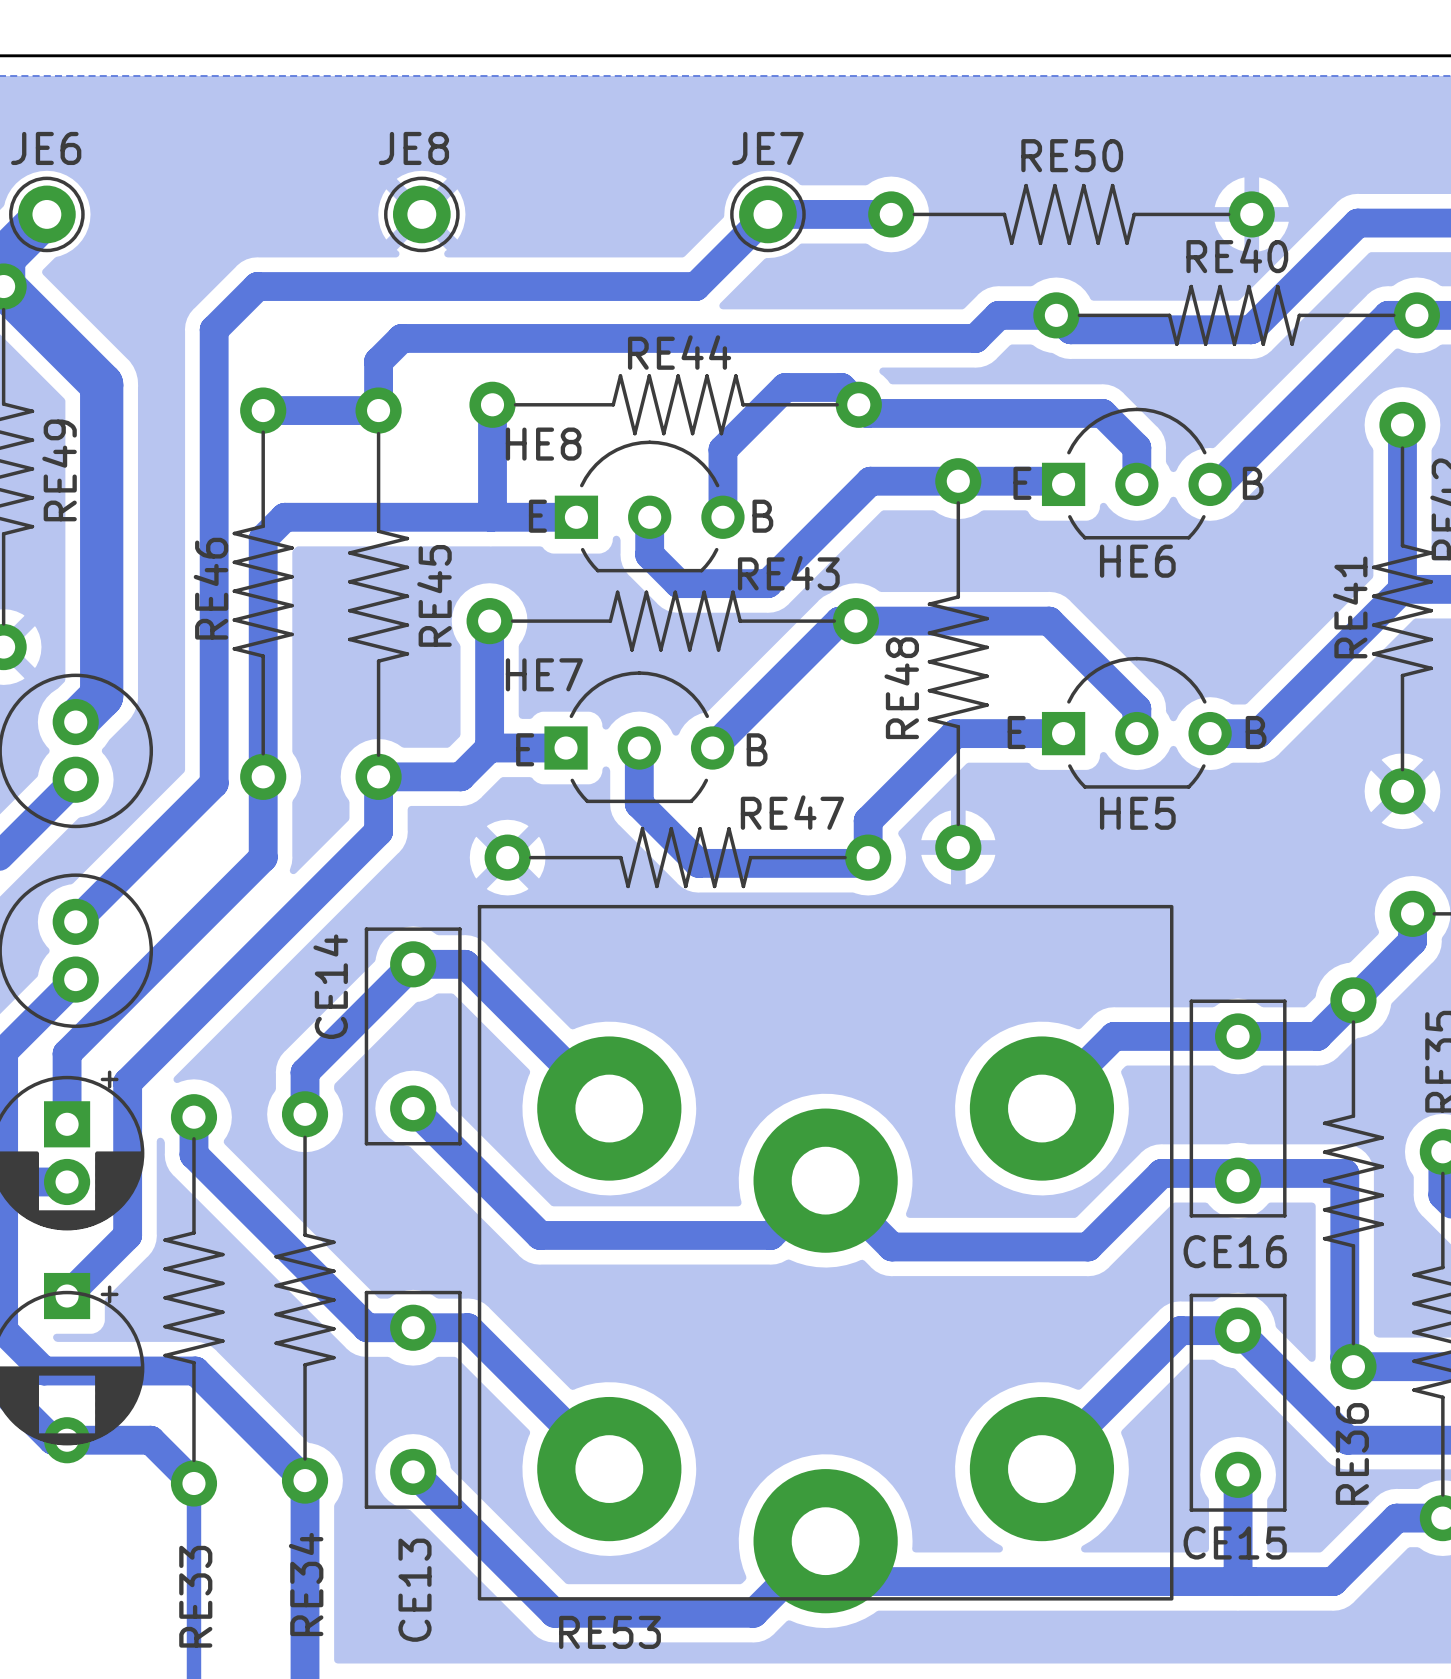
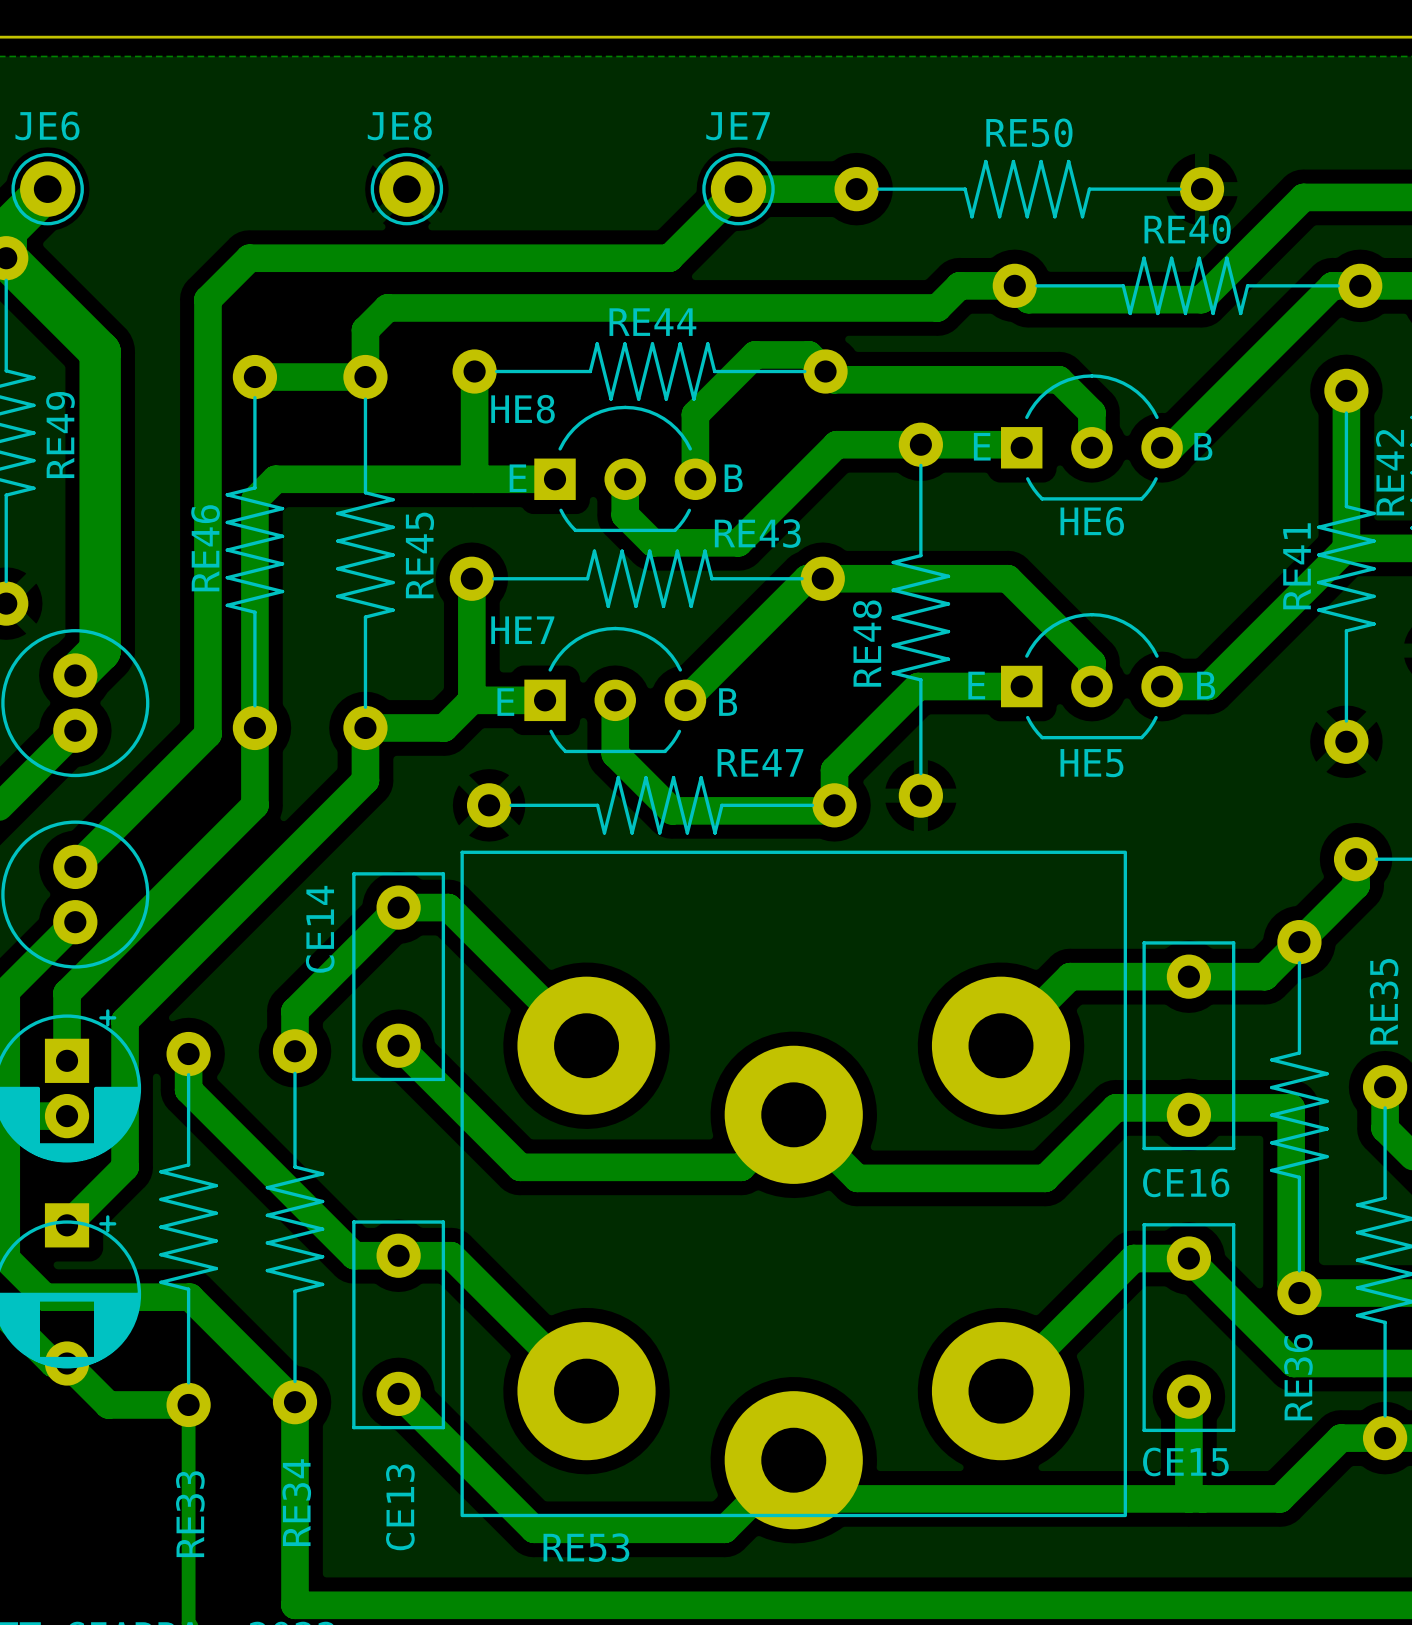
bottom track: (67, 1440) (150, 1440) (193, 1483) -> (67, 1363) (108, 1404) (188, 1404)

